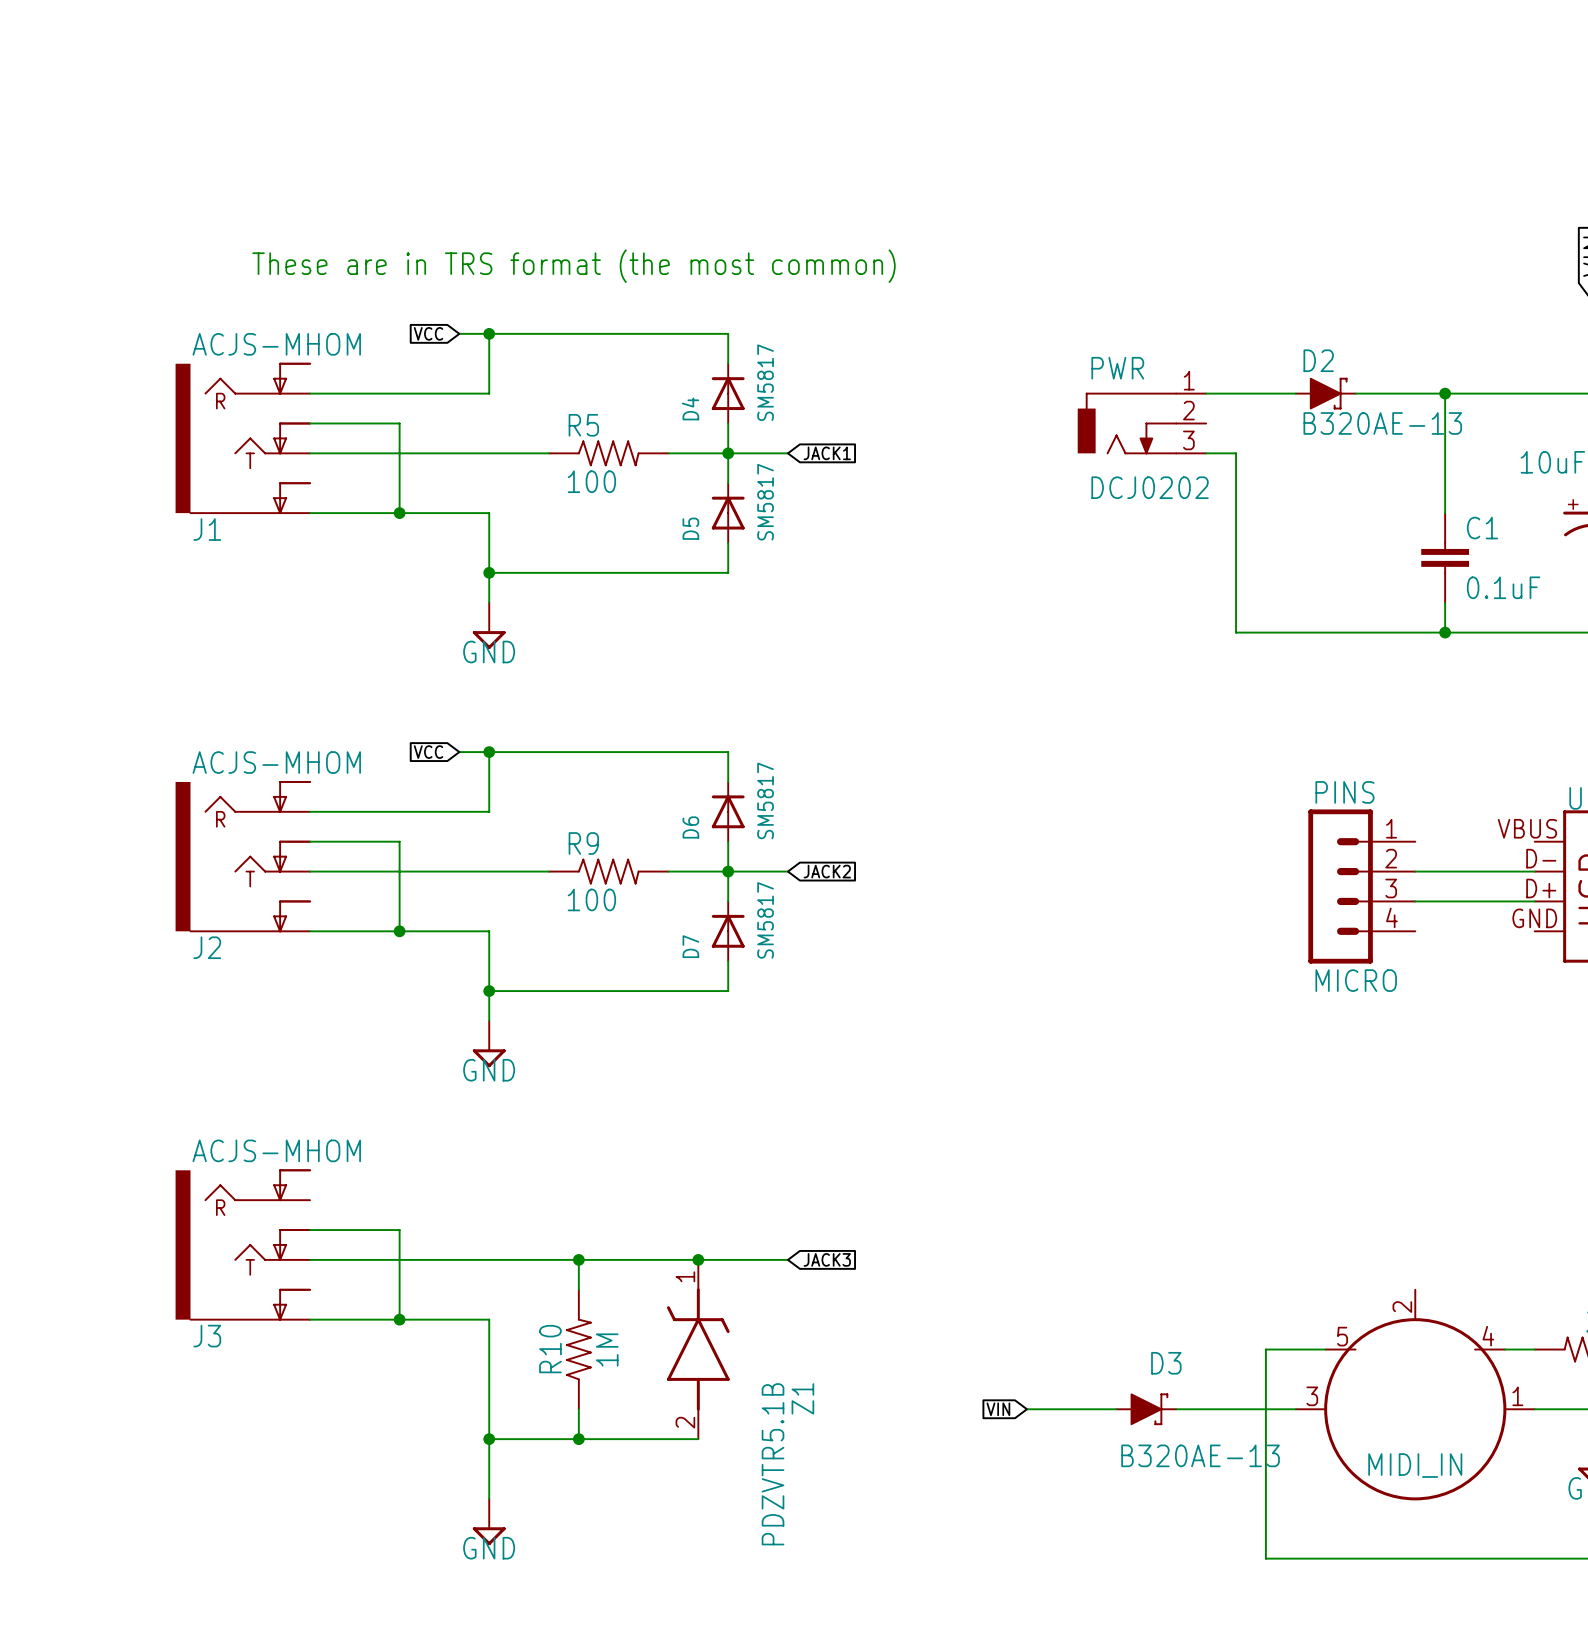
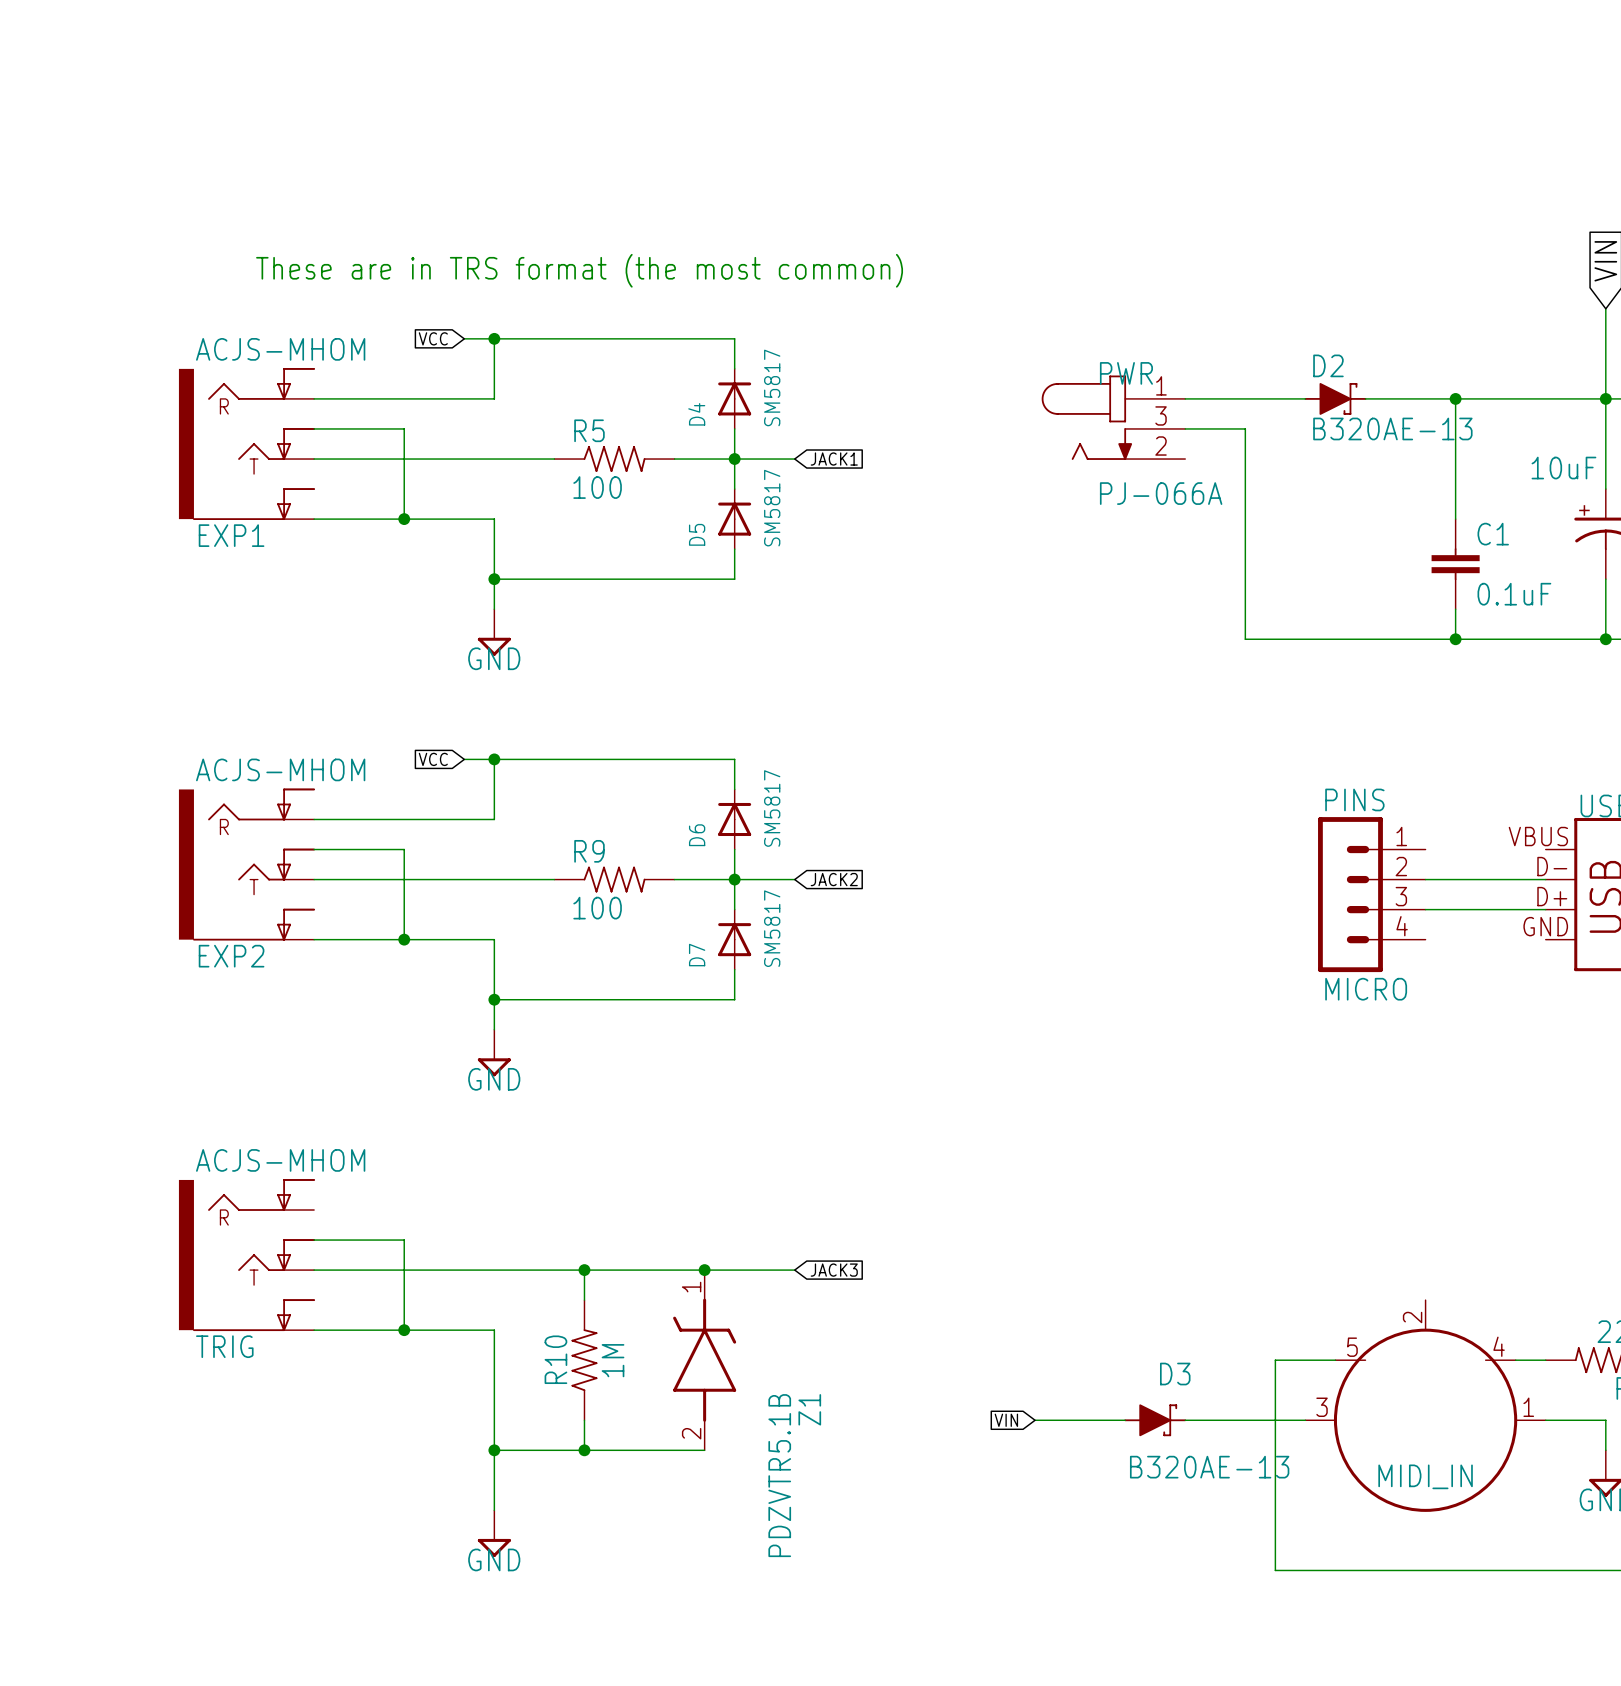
PWR: none -> PJ-066A (1113, 417)
PWR: DCJ0202 (1141, 423) -> none
wire: (1206, 453) (1236, 453) -> (1185, 428) (1245, 428) (1245, 459)
J1 name: J1 (207, 529) -> EXP1 (231, 535)
J2 name: J2 (207, 947) -> EXP2 (231, 956)
J3 name: J3 (207, 1336) -> TRIG (224, 1346)

